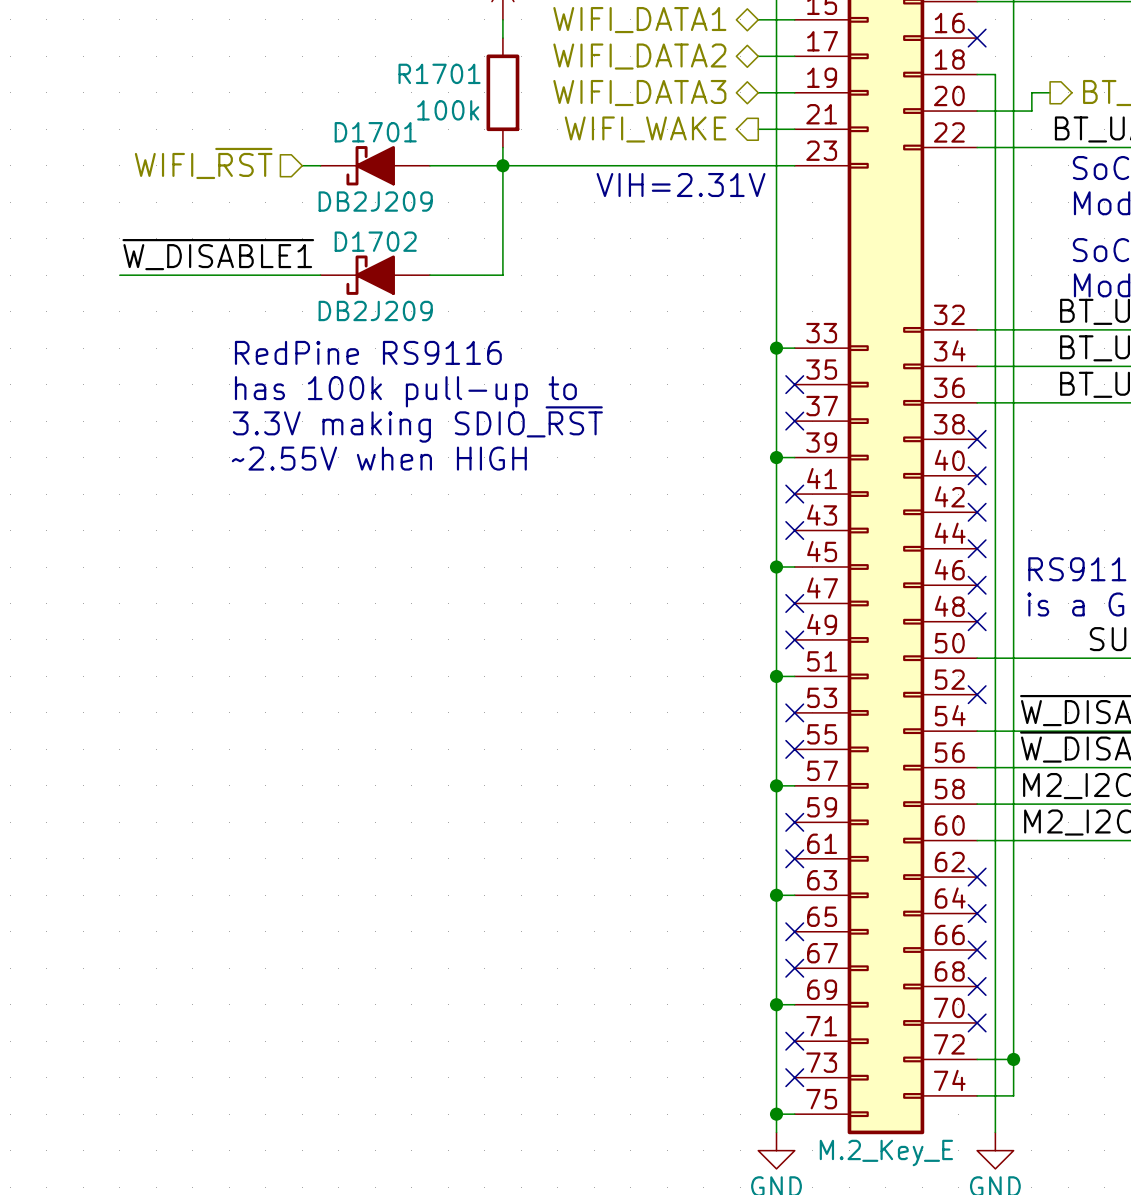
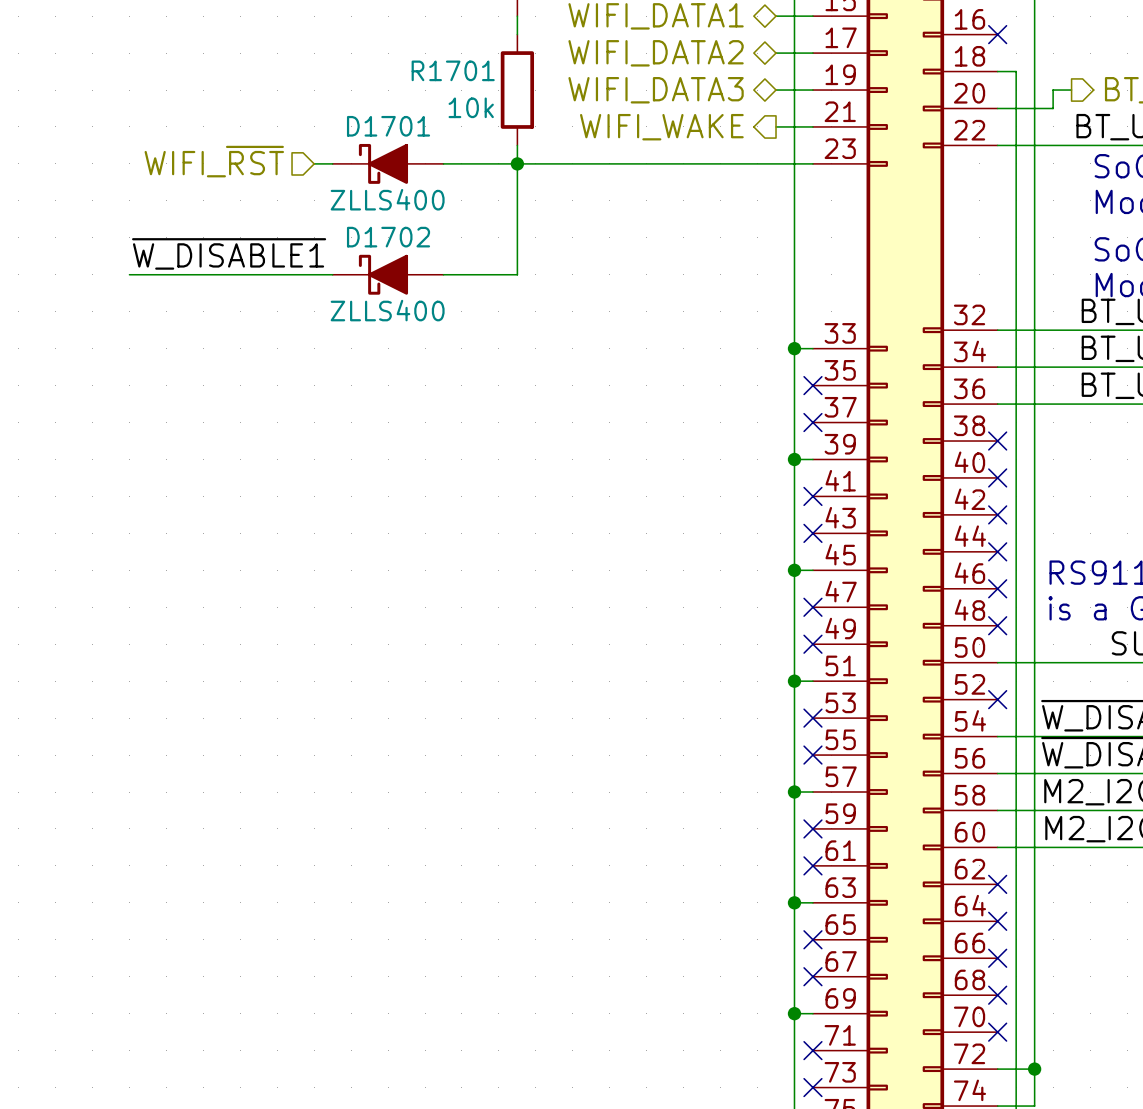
R1701 value: 100k (448, 110) -> 10k (471, 107)
D1701 flip: as is (370, 165) -> up-down (383, 163)
text: VIH=2.31V (681, 185) -> none
D1701 value: DB2J209 (375, 201) -> ZLLS400 (387, 199)
D1702 flip: as is (370, 275) -> up-down (383, 274)
D1702 value: DB2J209 (375, 310) -> ZLLS400 (387, 310)
text: RedPine RS9116 (368, 352) -> none
text: has 100k pull-up to (405, 391) -> none
text: 3.3V making SDIO_~{RST} (417, 424) -> none
text: ~2.55V when HIGH (379, 458) -> none

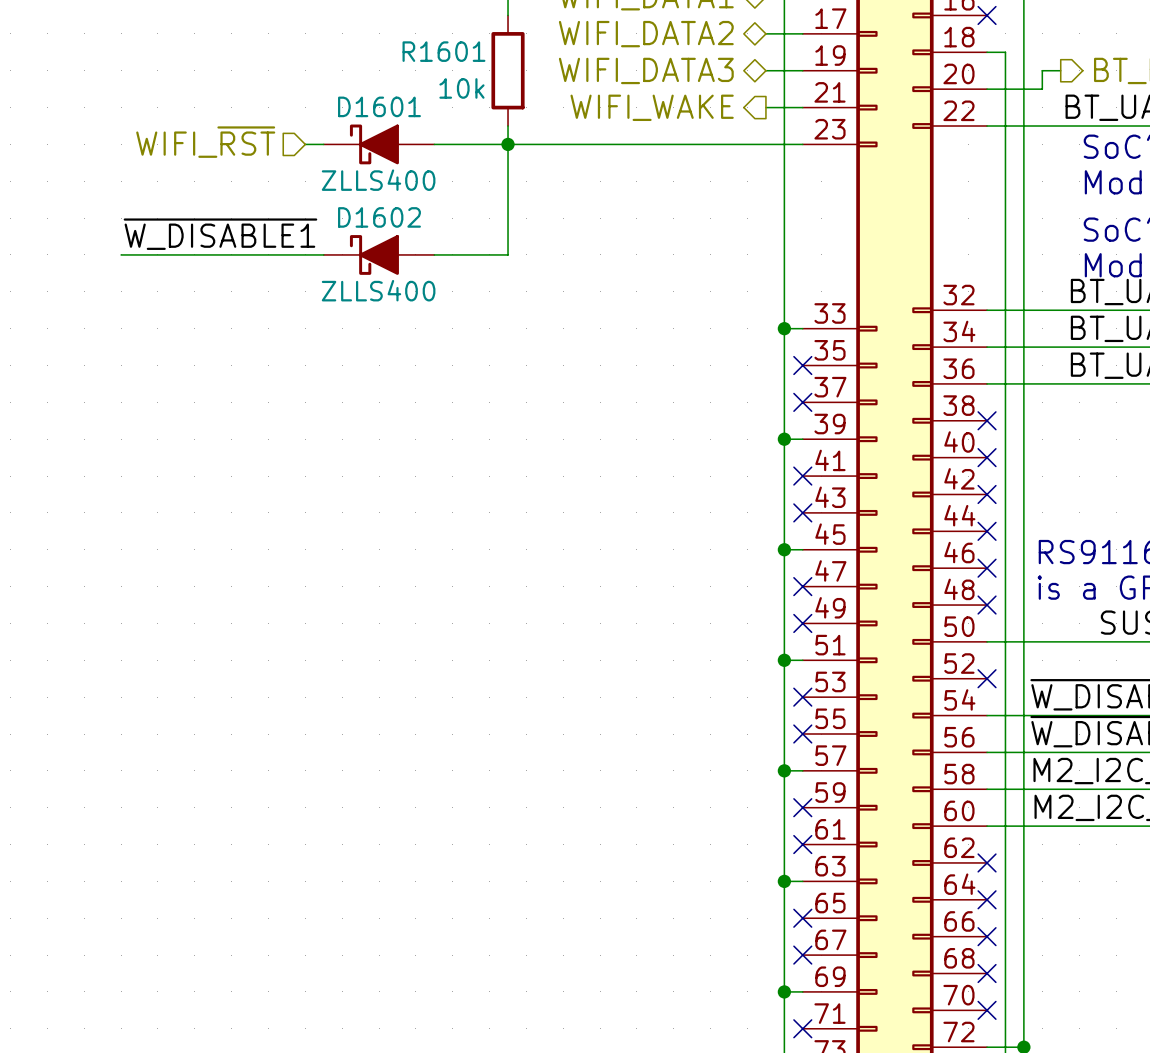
R1701 name: R1701 (453, 70) -> R1601 (443, 51)
D1701 name: D1701 (388, 126) -> D1601 (379, 106)
D1702 name: D1702 (388, 237) -> D1602 (379, 217)

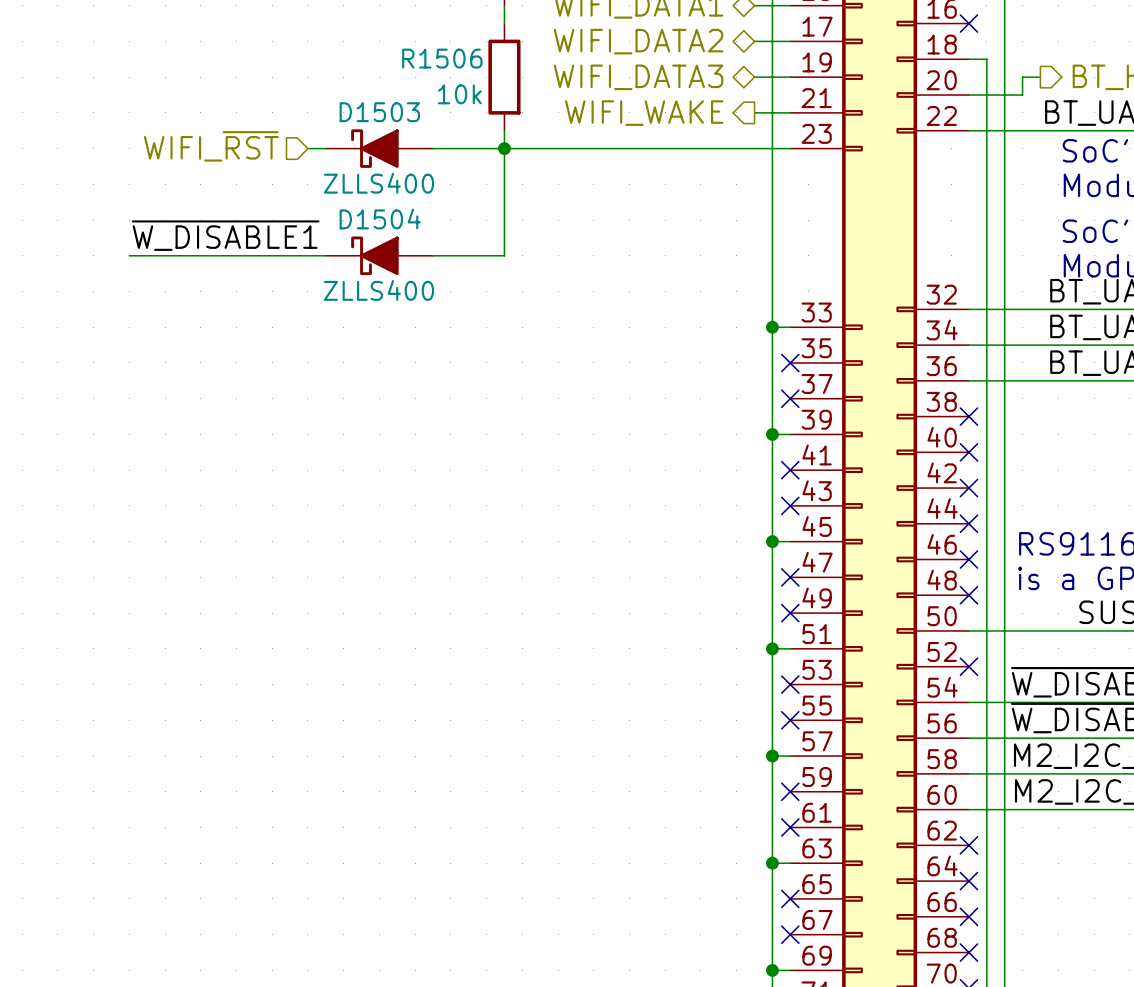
R1601 name: R1601 (443, 51) -> R1506 (442, 58)
D1601 name: D1601 (379, 106) -> D1503 (379, 112)
D1602 name: D1602 (379, 217) -> D1504 (380, 218)

